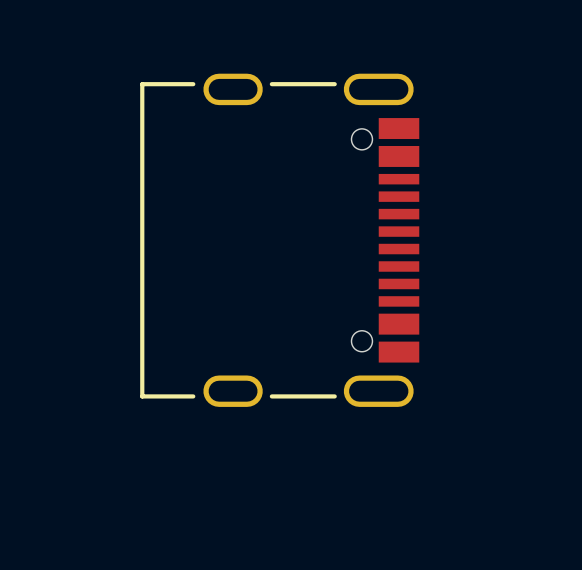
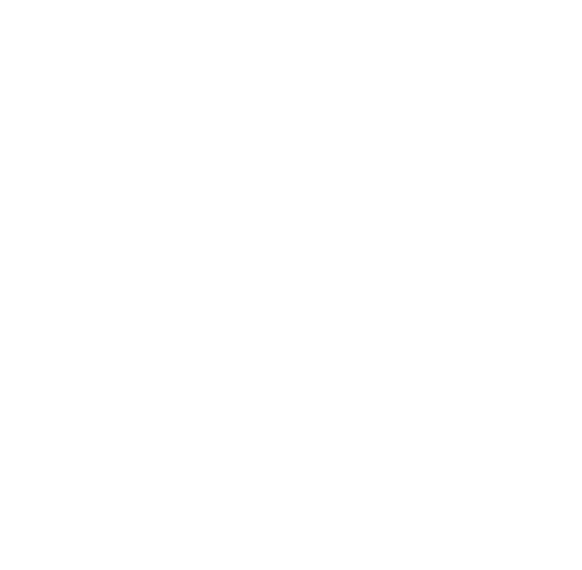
part: (279, 240) -> none

